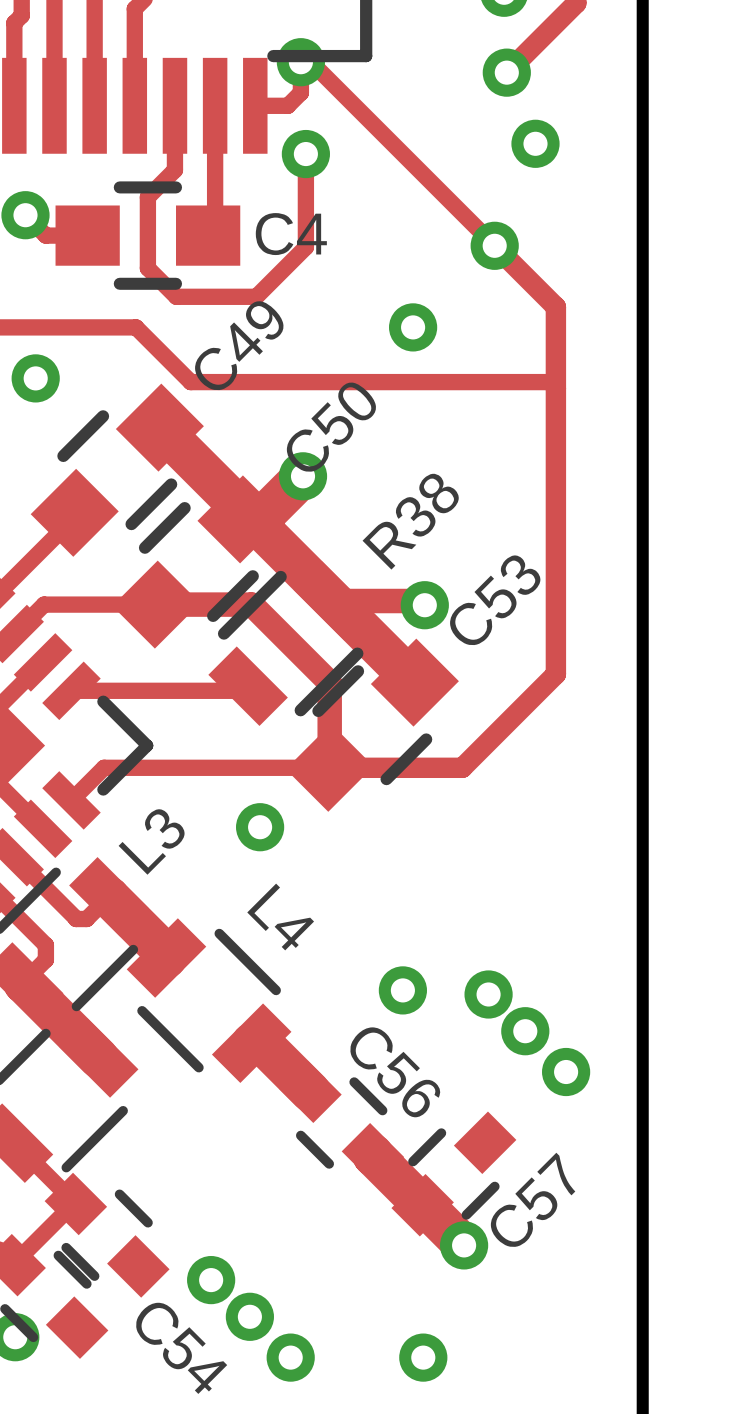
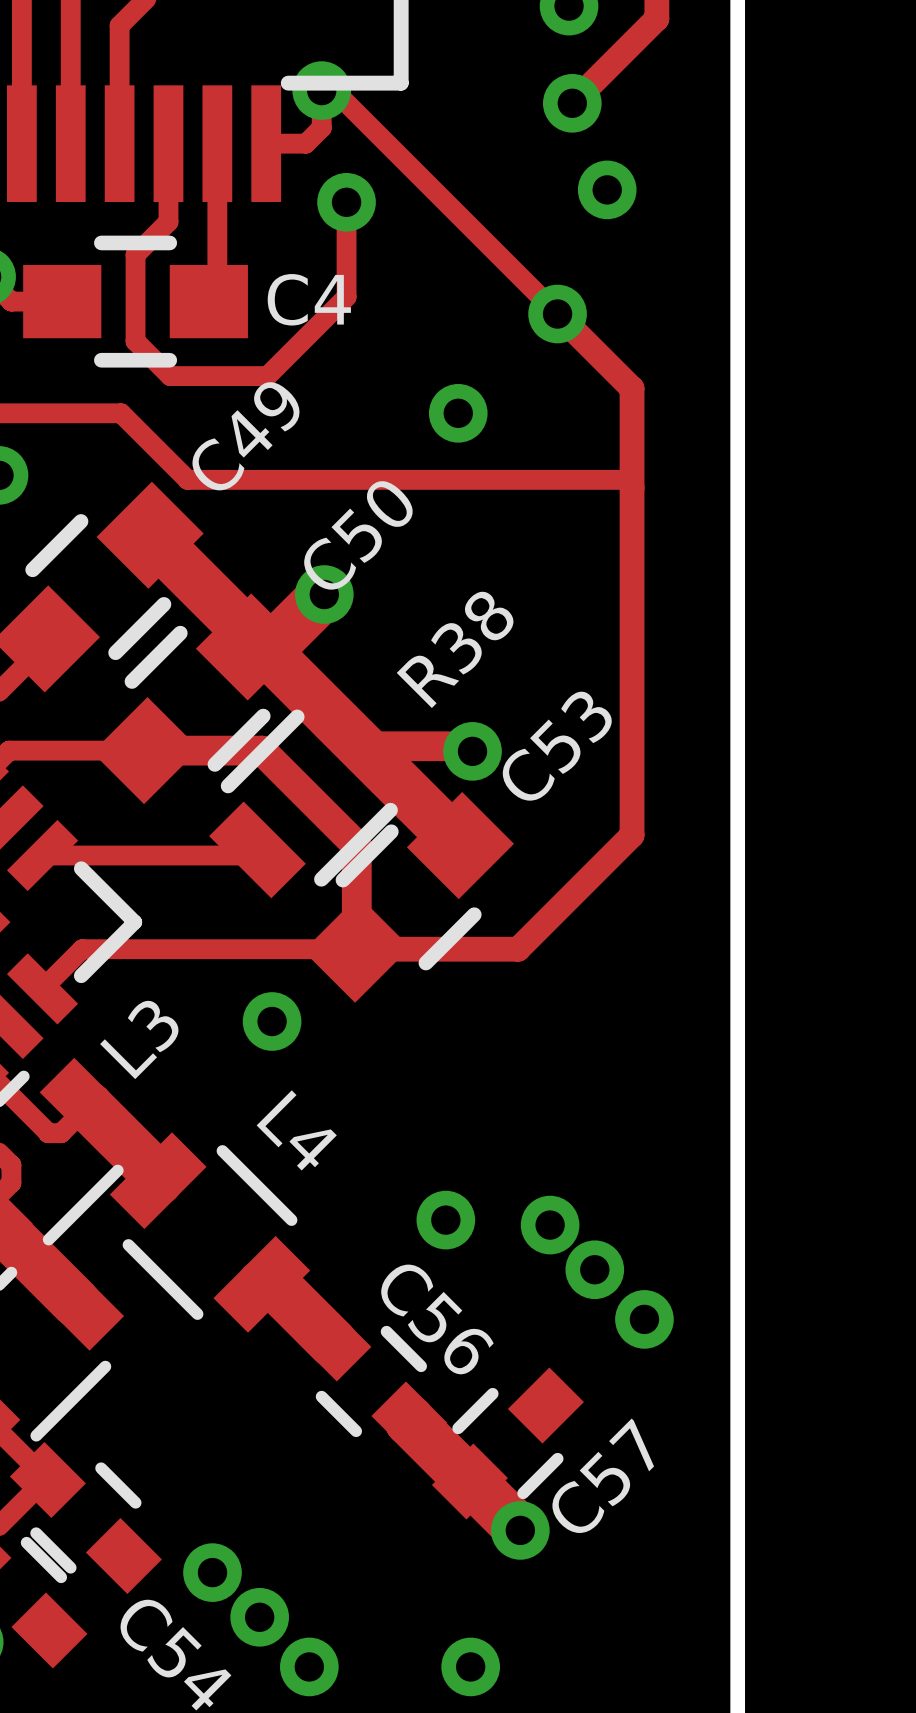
track: (305, 154) (305, 247) -> (346, 202) (346, 297) (327, 315)
via position: (305, 154) -> (346, 202)

